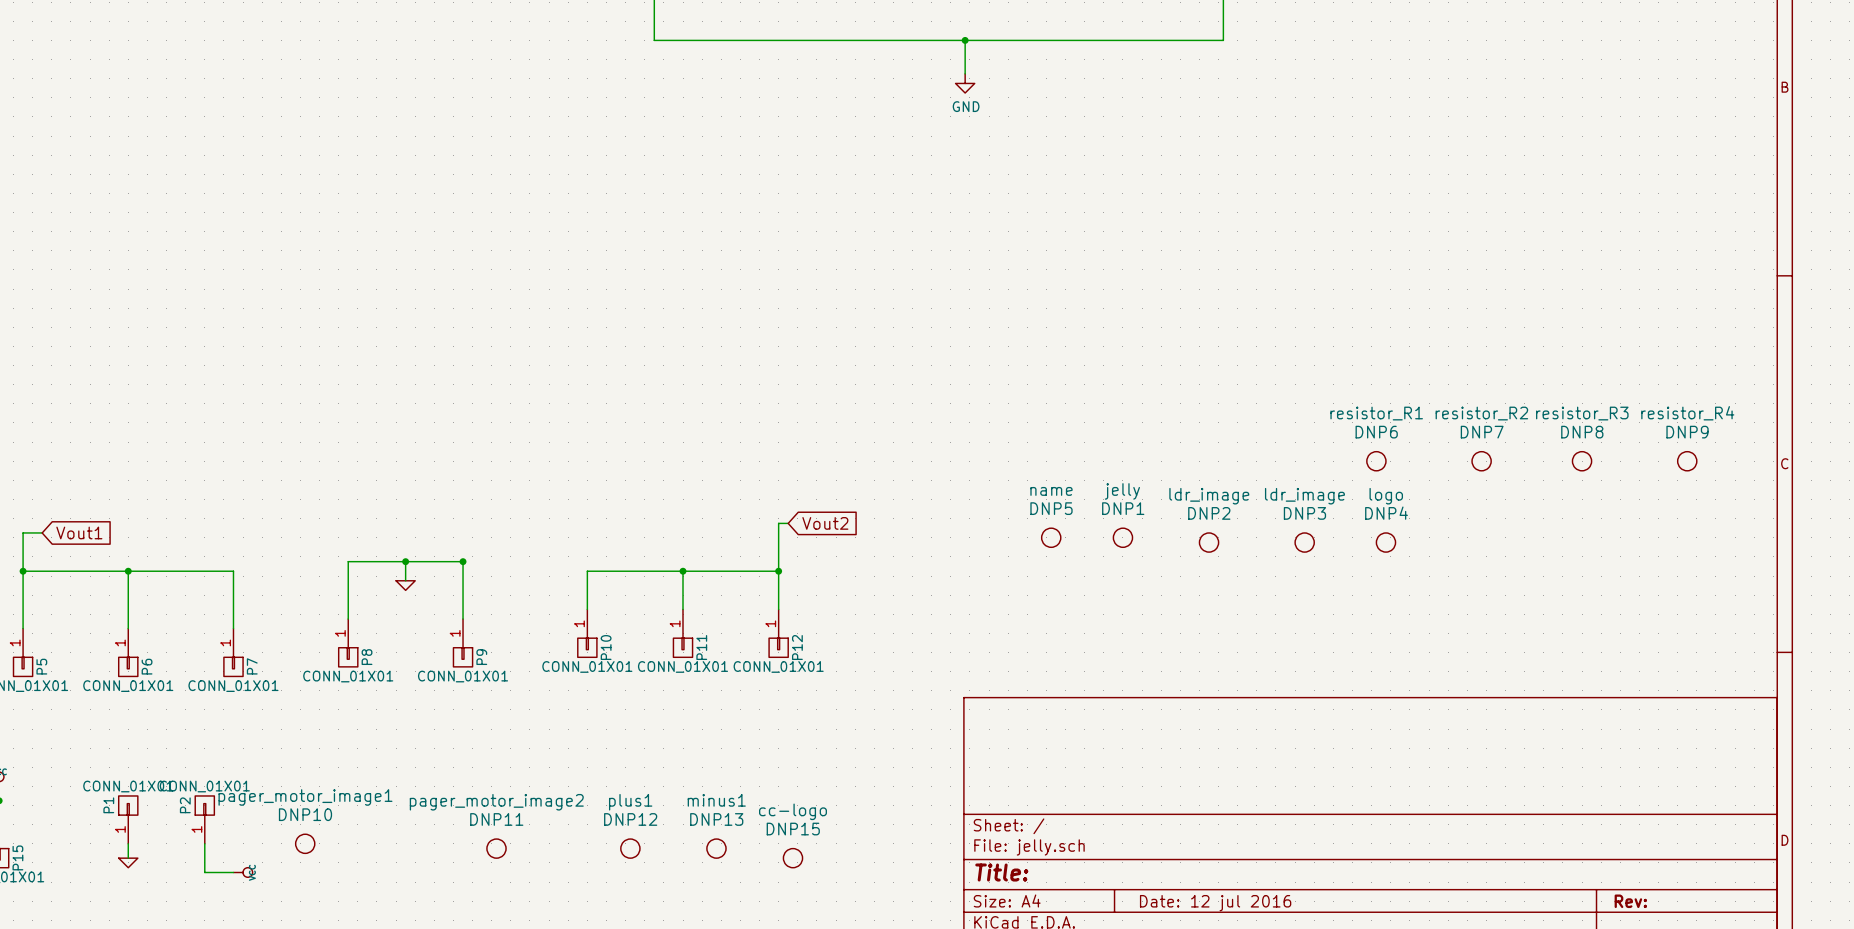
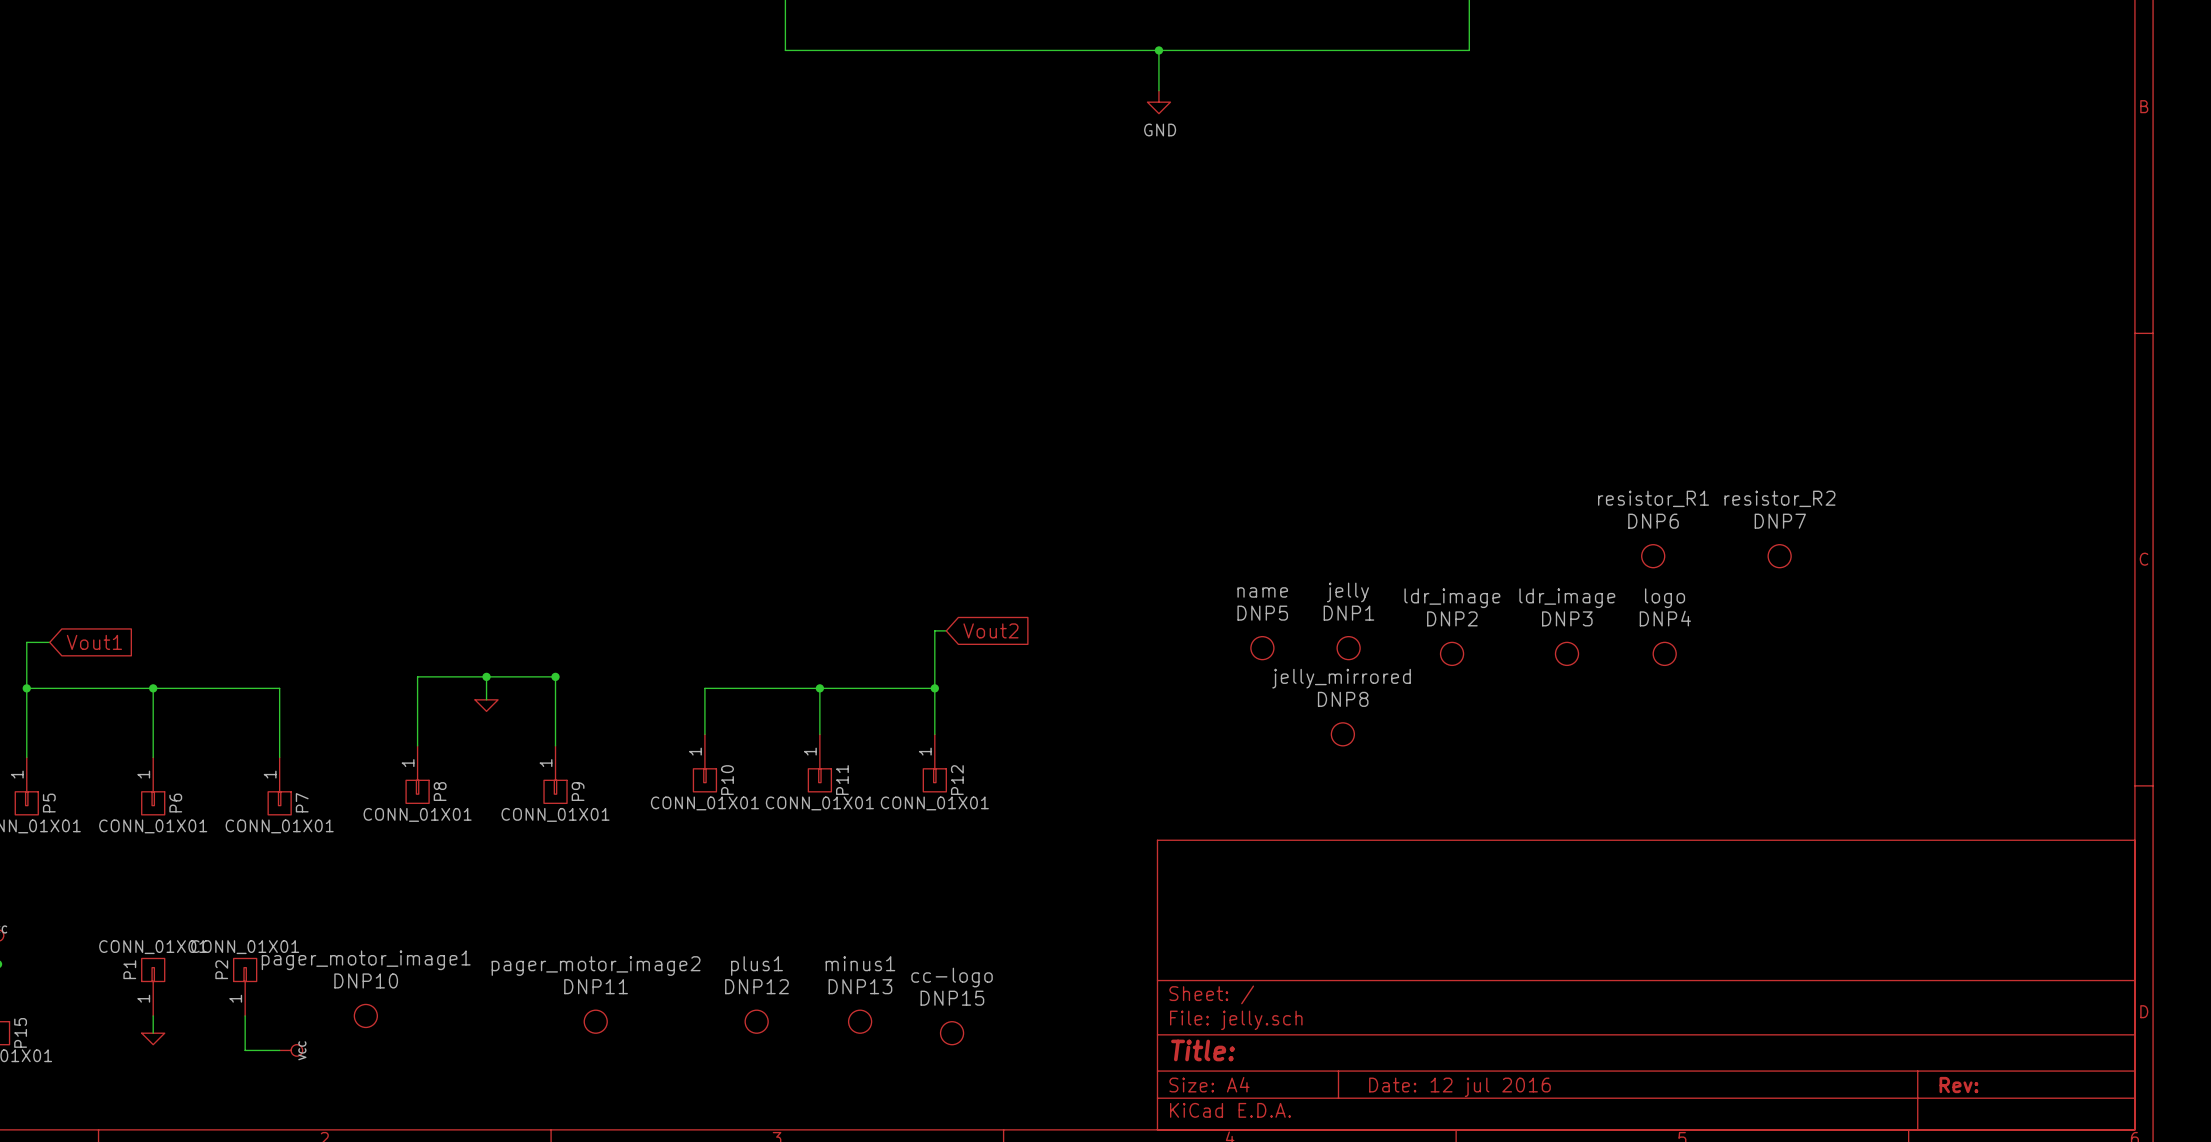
DNP8 value: resistor_R3 (1582, 413) -> jelly_mirrored (1341, 678)
DNP8 position: (1582, 461) -> (1342, 734)
DNP9: resistor_R4 (1687, 461) -> none

